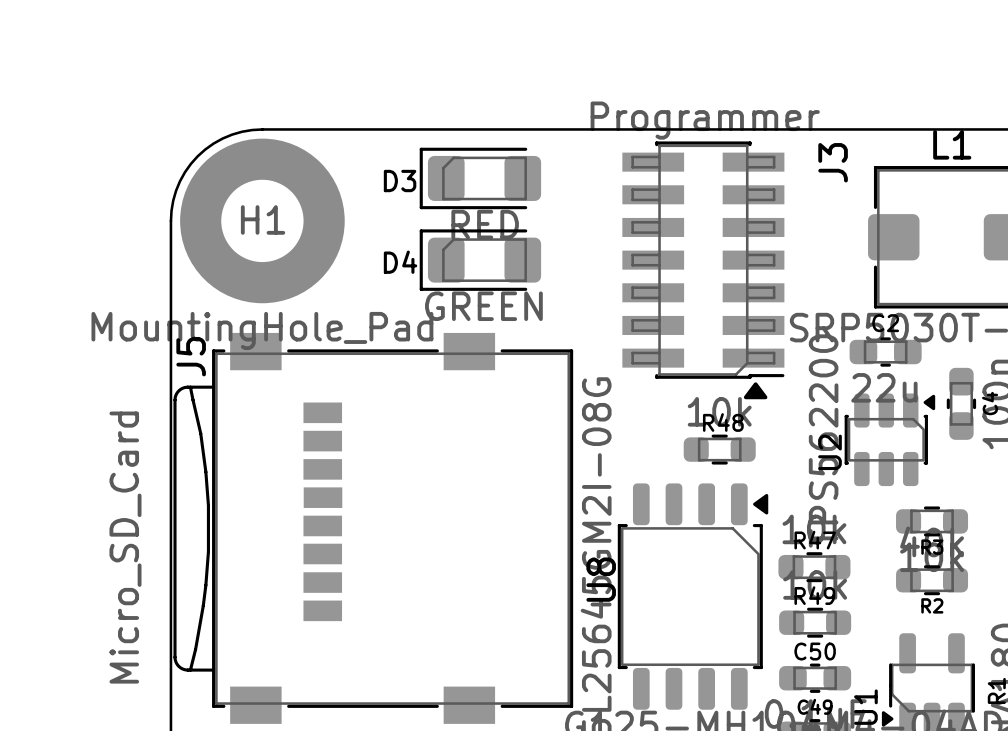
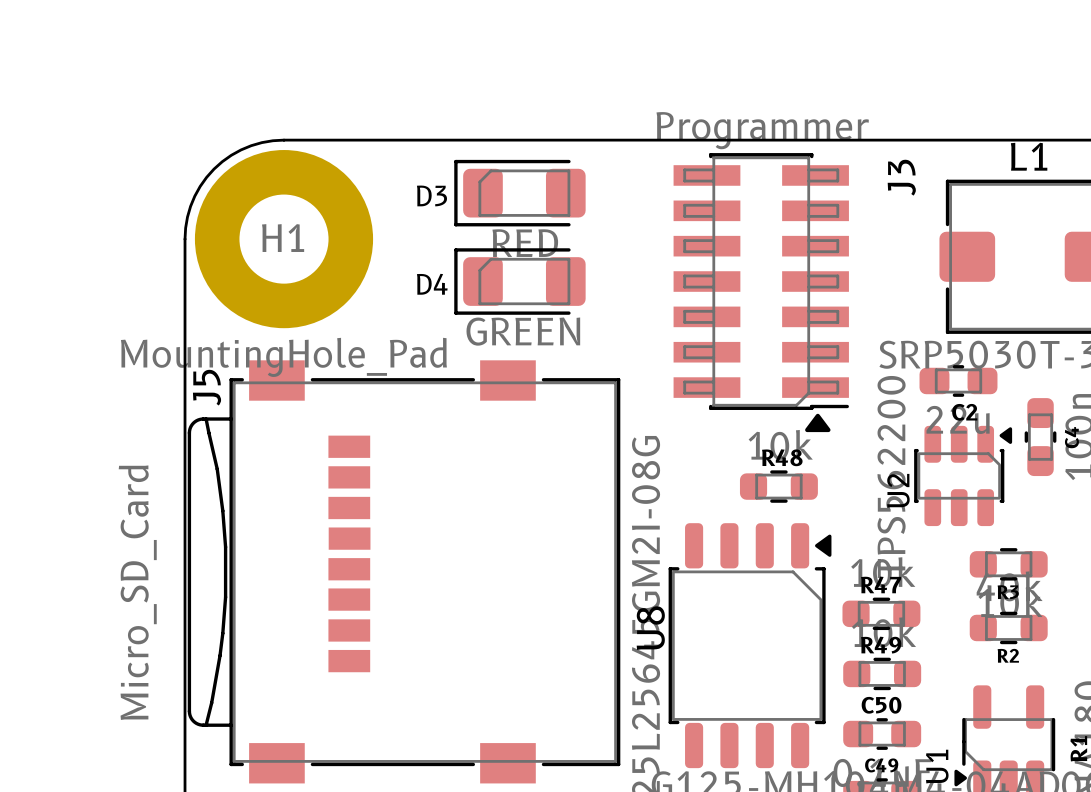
C2 name position: C2 (885, 323) -> C2 (964, 412)

